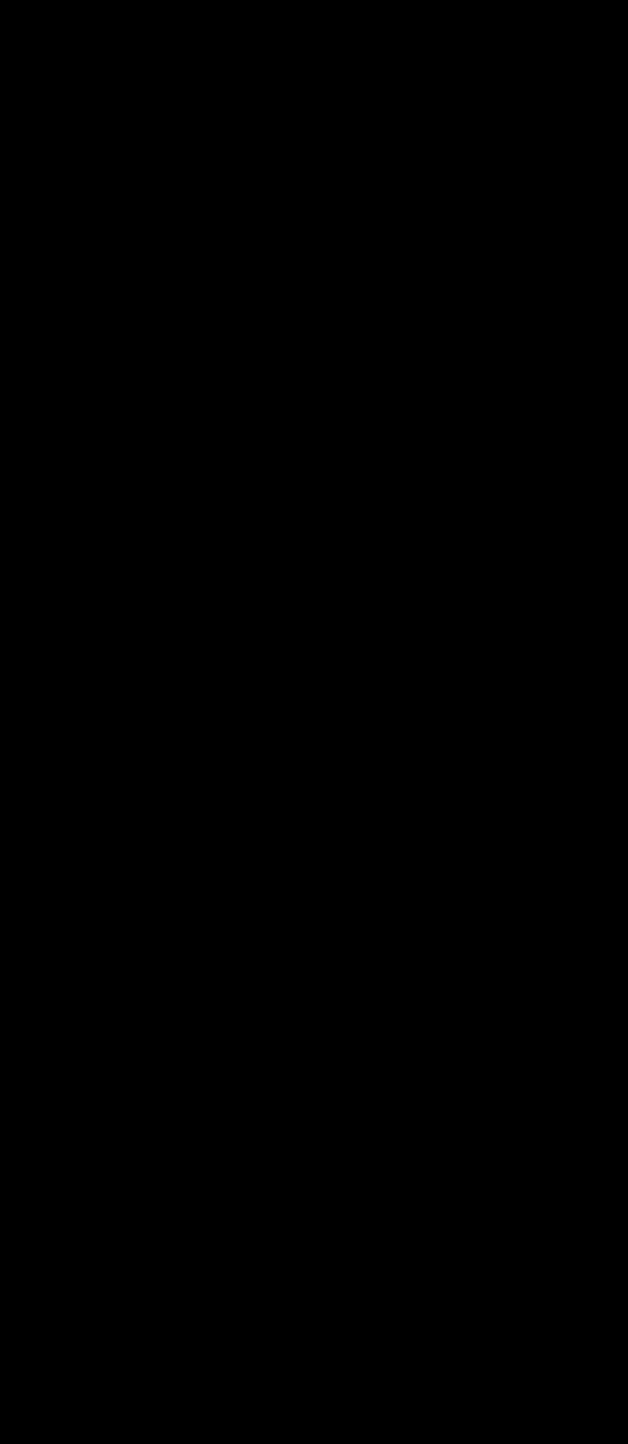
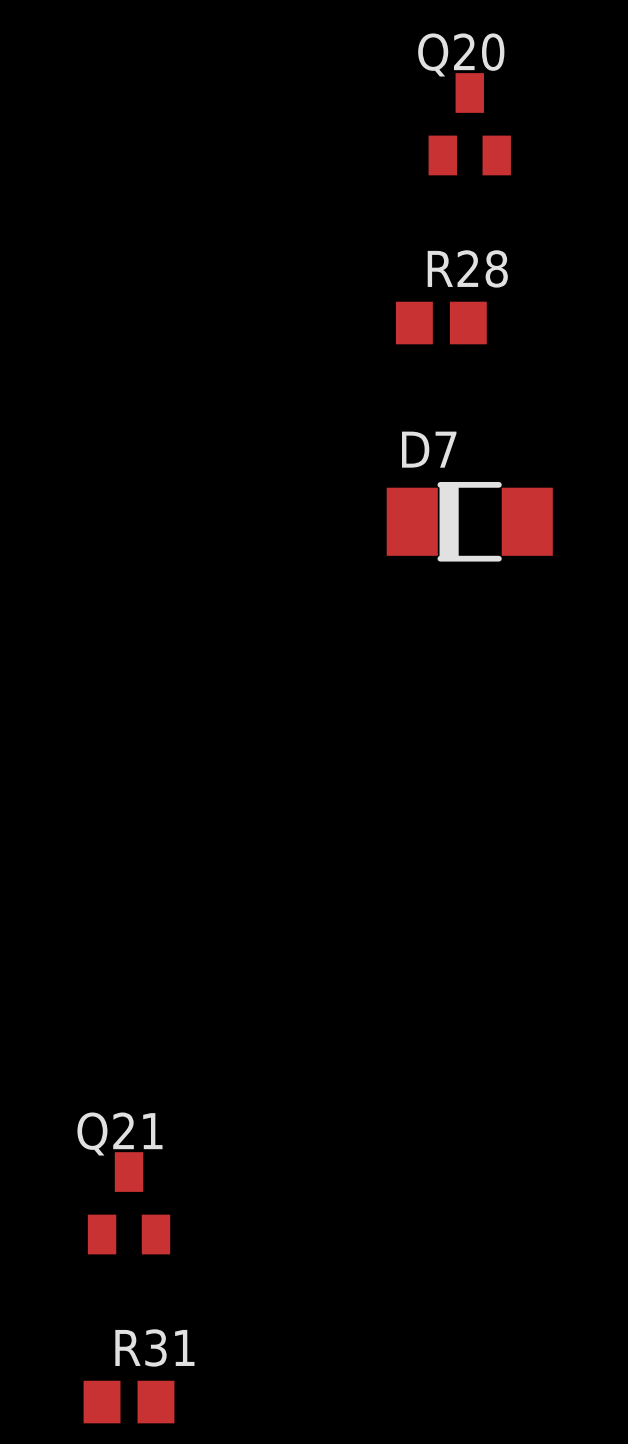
Q20: none -> (469, 124)
R28: none -> (441, 323)
D7: none -> (469, 521)
Q21: none -> (129, 1203)
R31: none -> (129, 1402)

